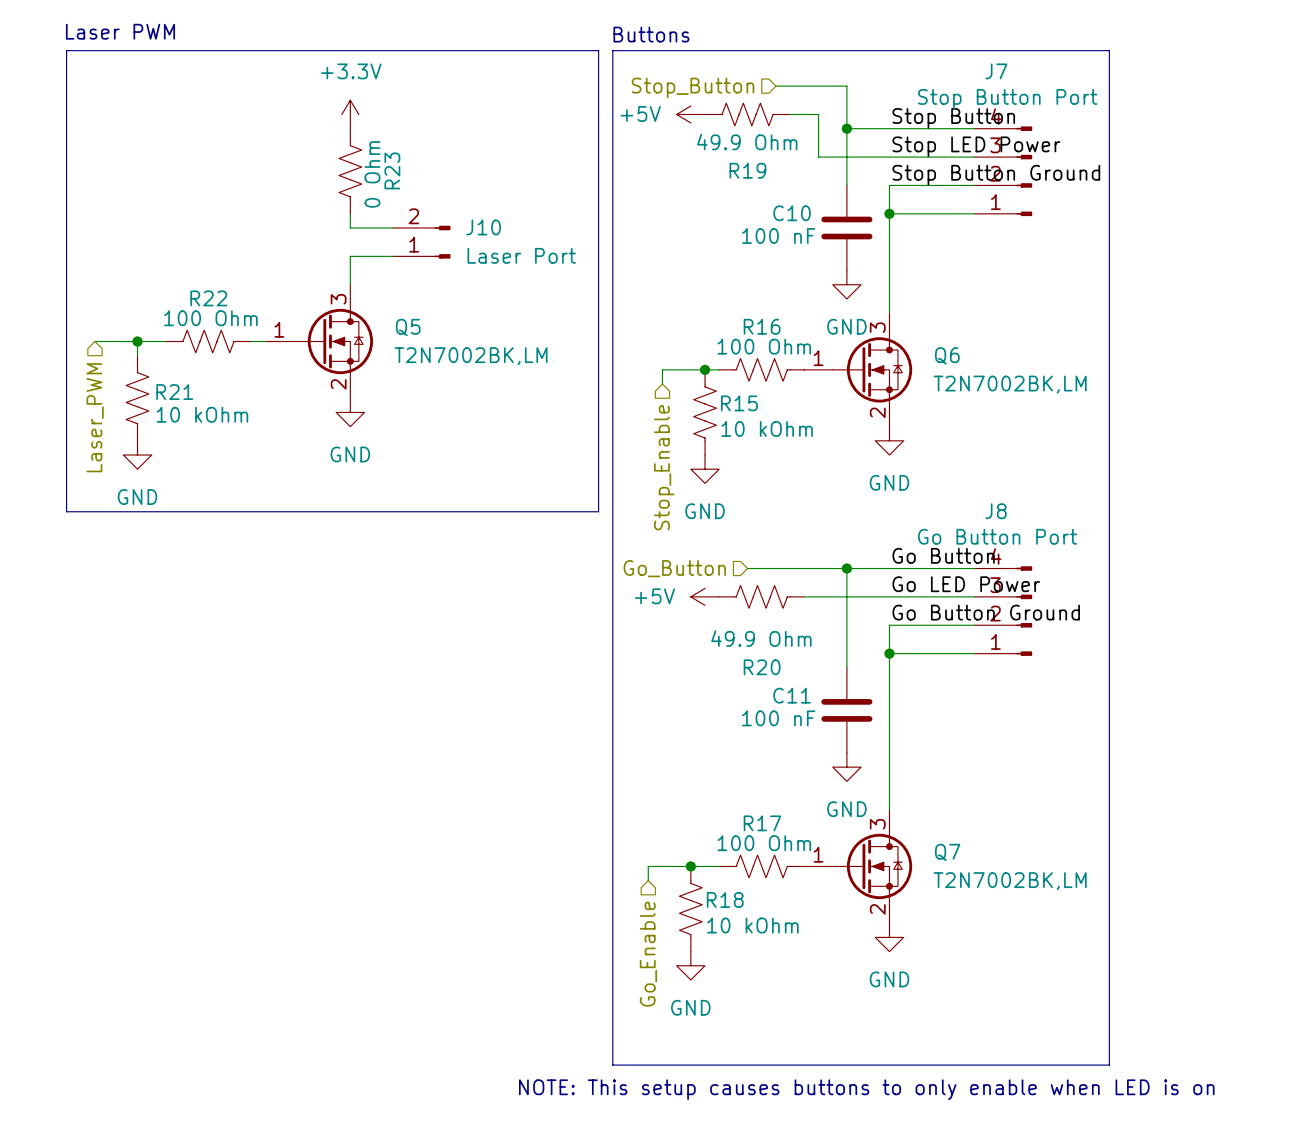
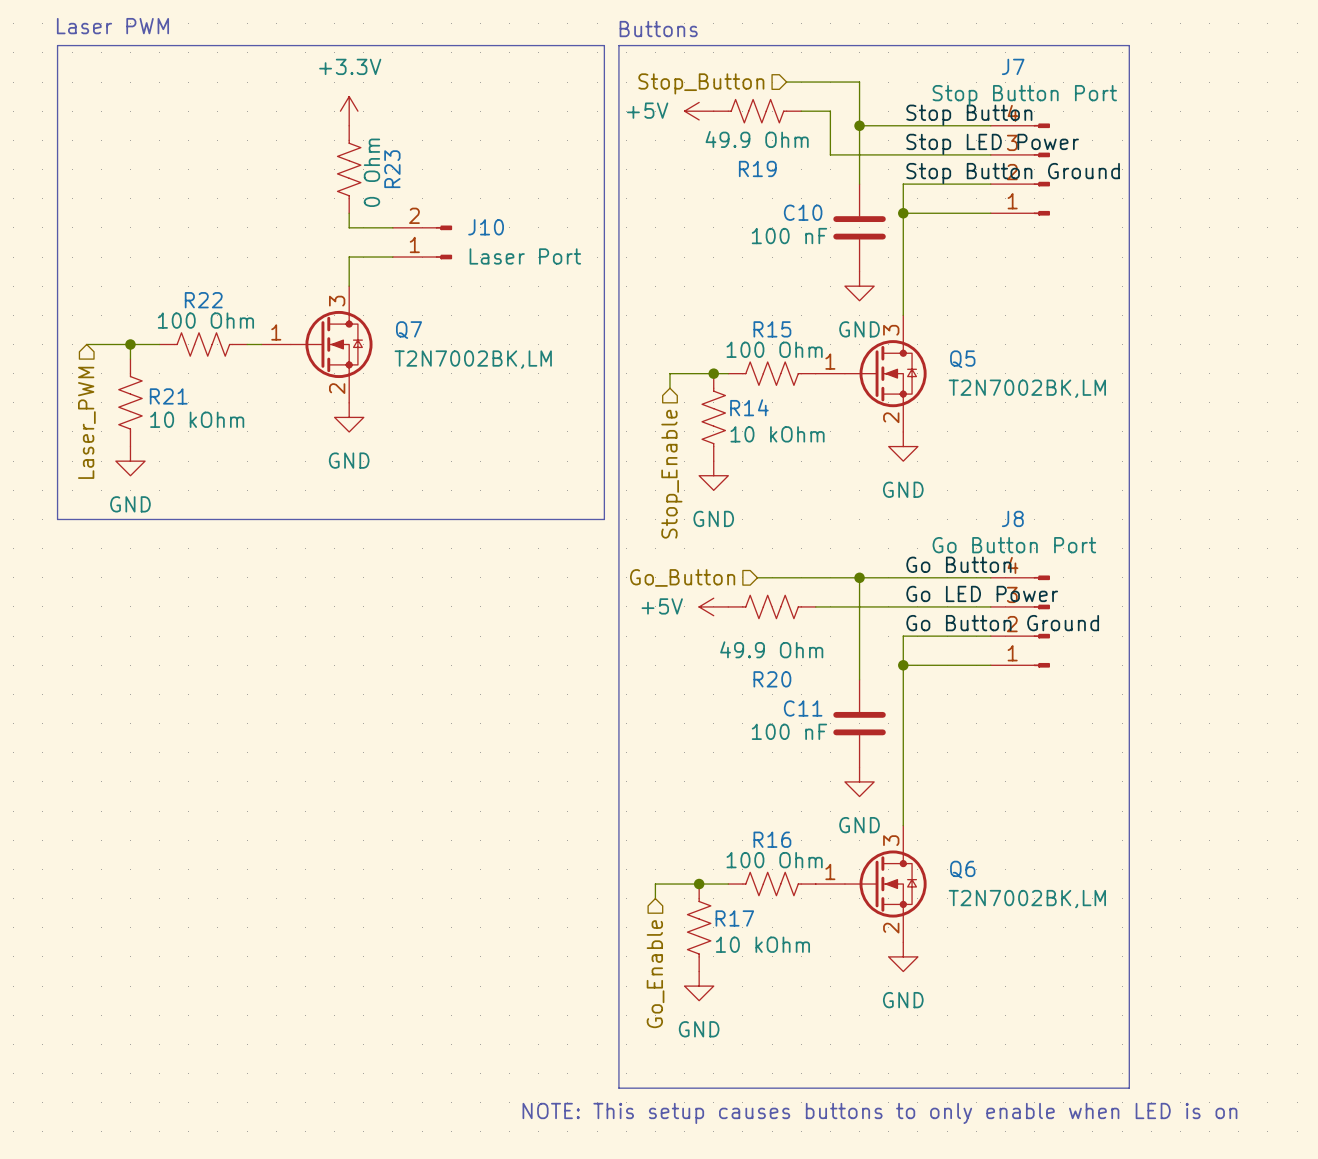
R16 name: R16 (762, 326) -> R15 (772, 329)
Q5 name: Q5 (408, 327) -> Q7 (409, 330)
Q6 name: Q6 (947, 355) -> Q5 (962, 359)
R15 name: R15 (739, 403) -> R14 (749, 407)
R17 name: R17 (762, 823) -> R16 (772, 839)
Q7 name: Q7 (947, 852) -> Q6 (962, 869)
R18 name: R18 (725, 899) -> R17 (734, 918)

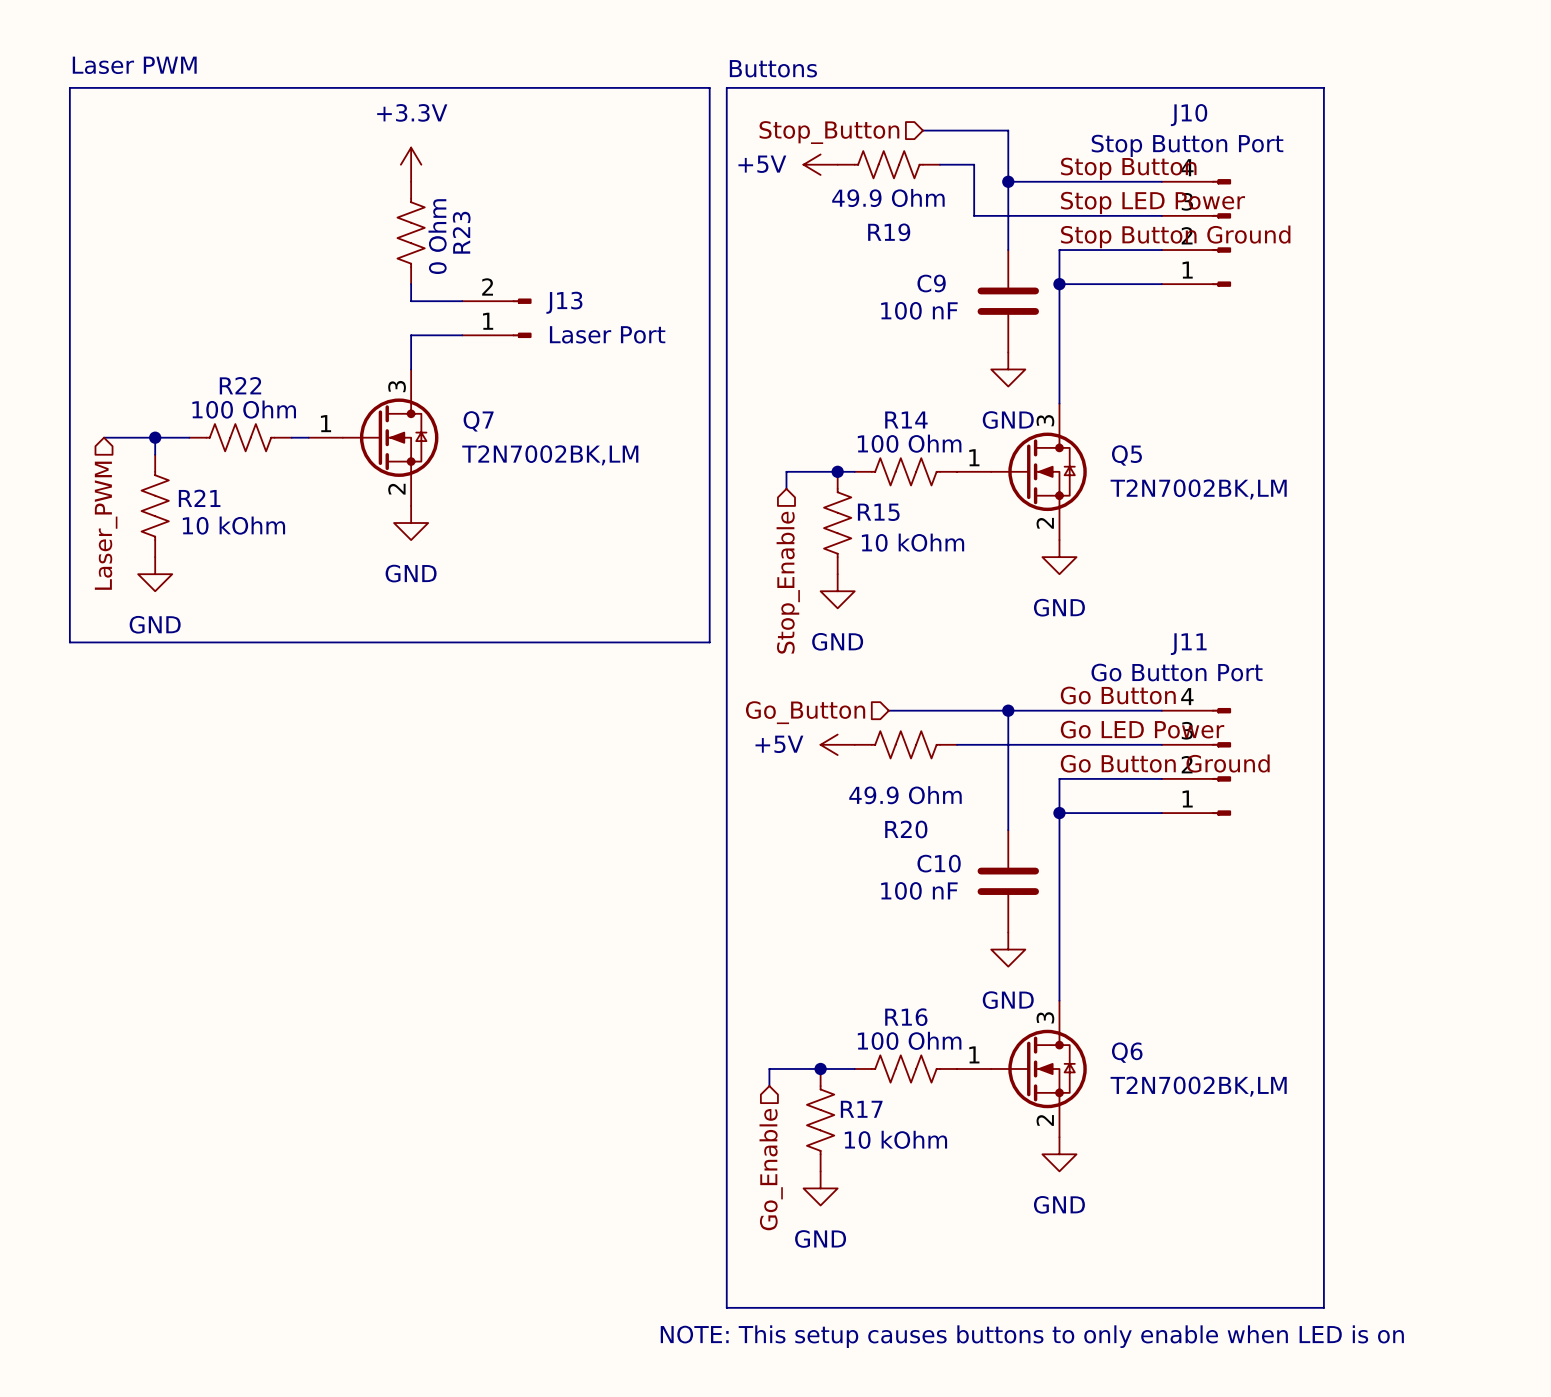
J7 name: J7 (1013, 66) -> J10 (1189, 115)
C10 name: C10 (803, 212) -> C9 (931, 283)
J10 name: J10 (486, 227) -> J13 (564, 302)
R15 name: R15 (772, 329) -> R14 (906, 420)
R14 name: R14 (749, 407) -> R15 (878, 512)
J8 name: J8 (1012, 518) -> J11 (1188, 644)
C11 name: C11 (803, 708) -> C10 (939, 863)

